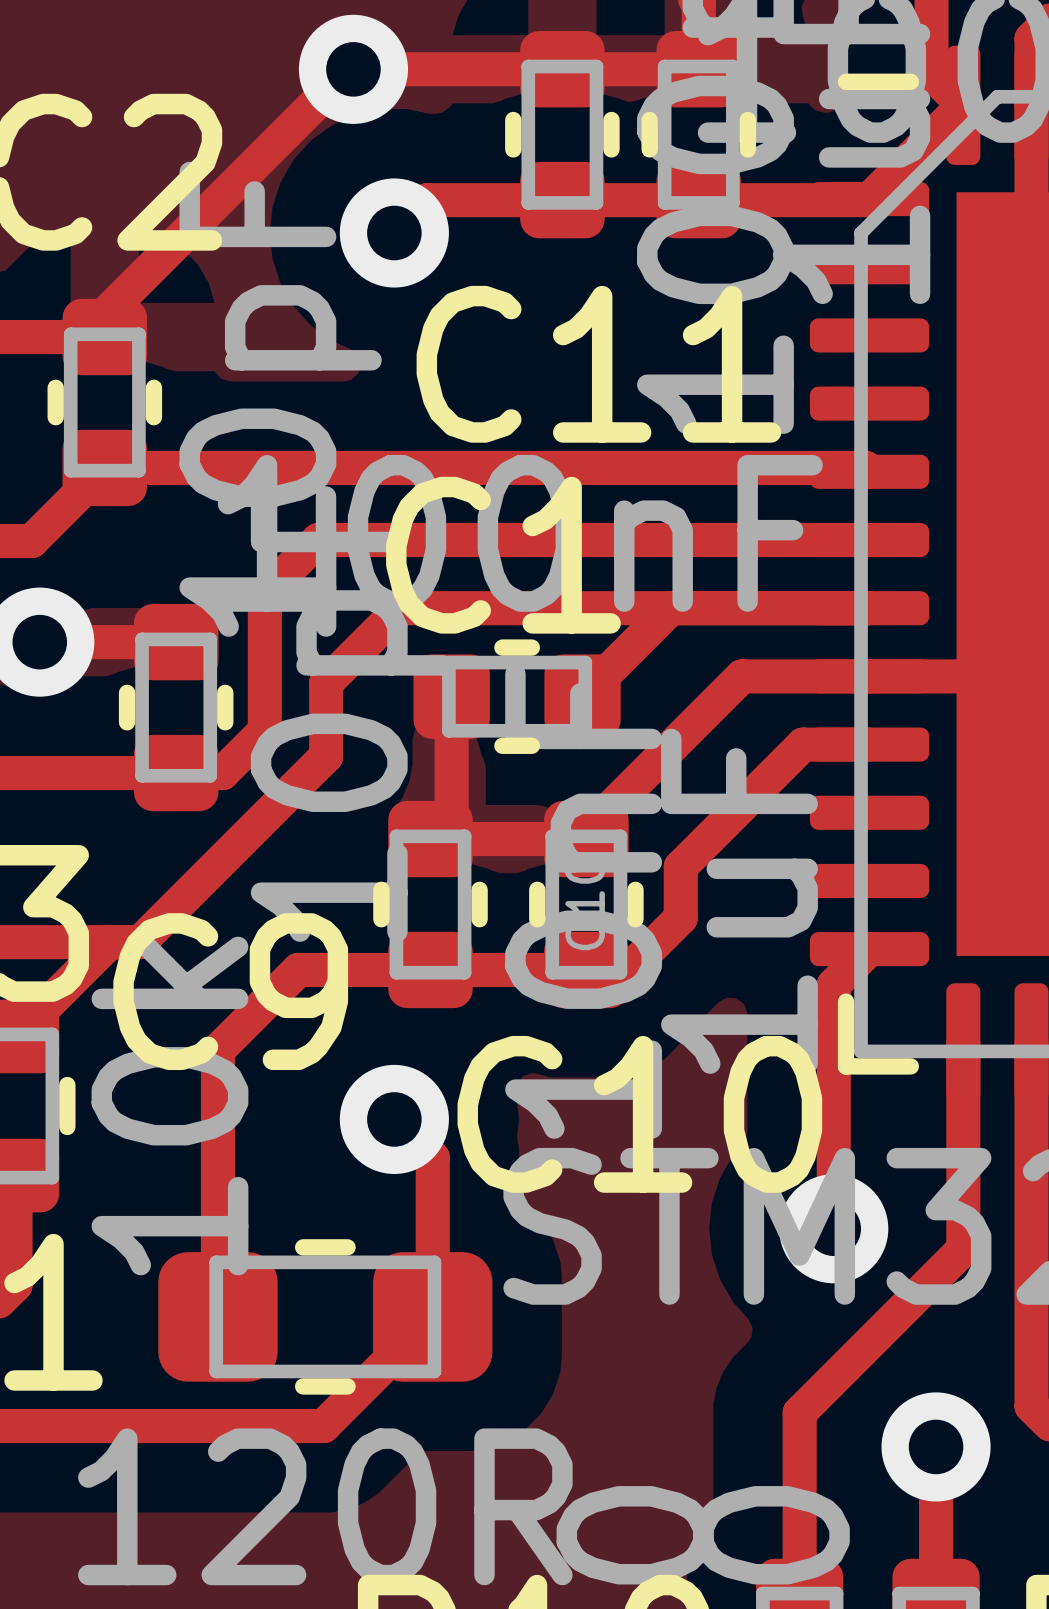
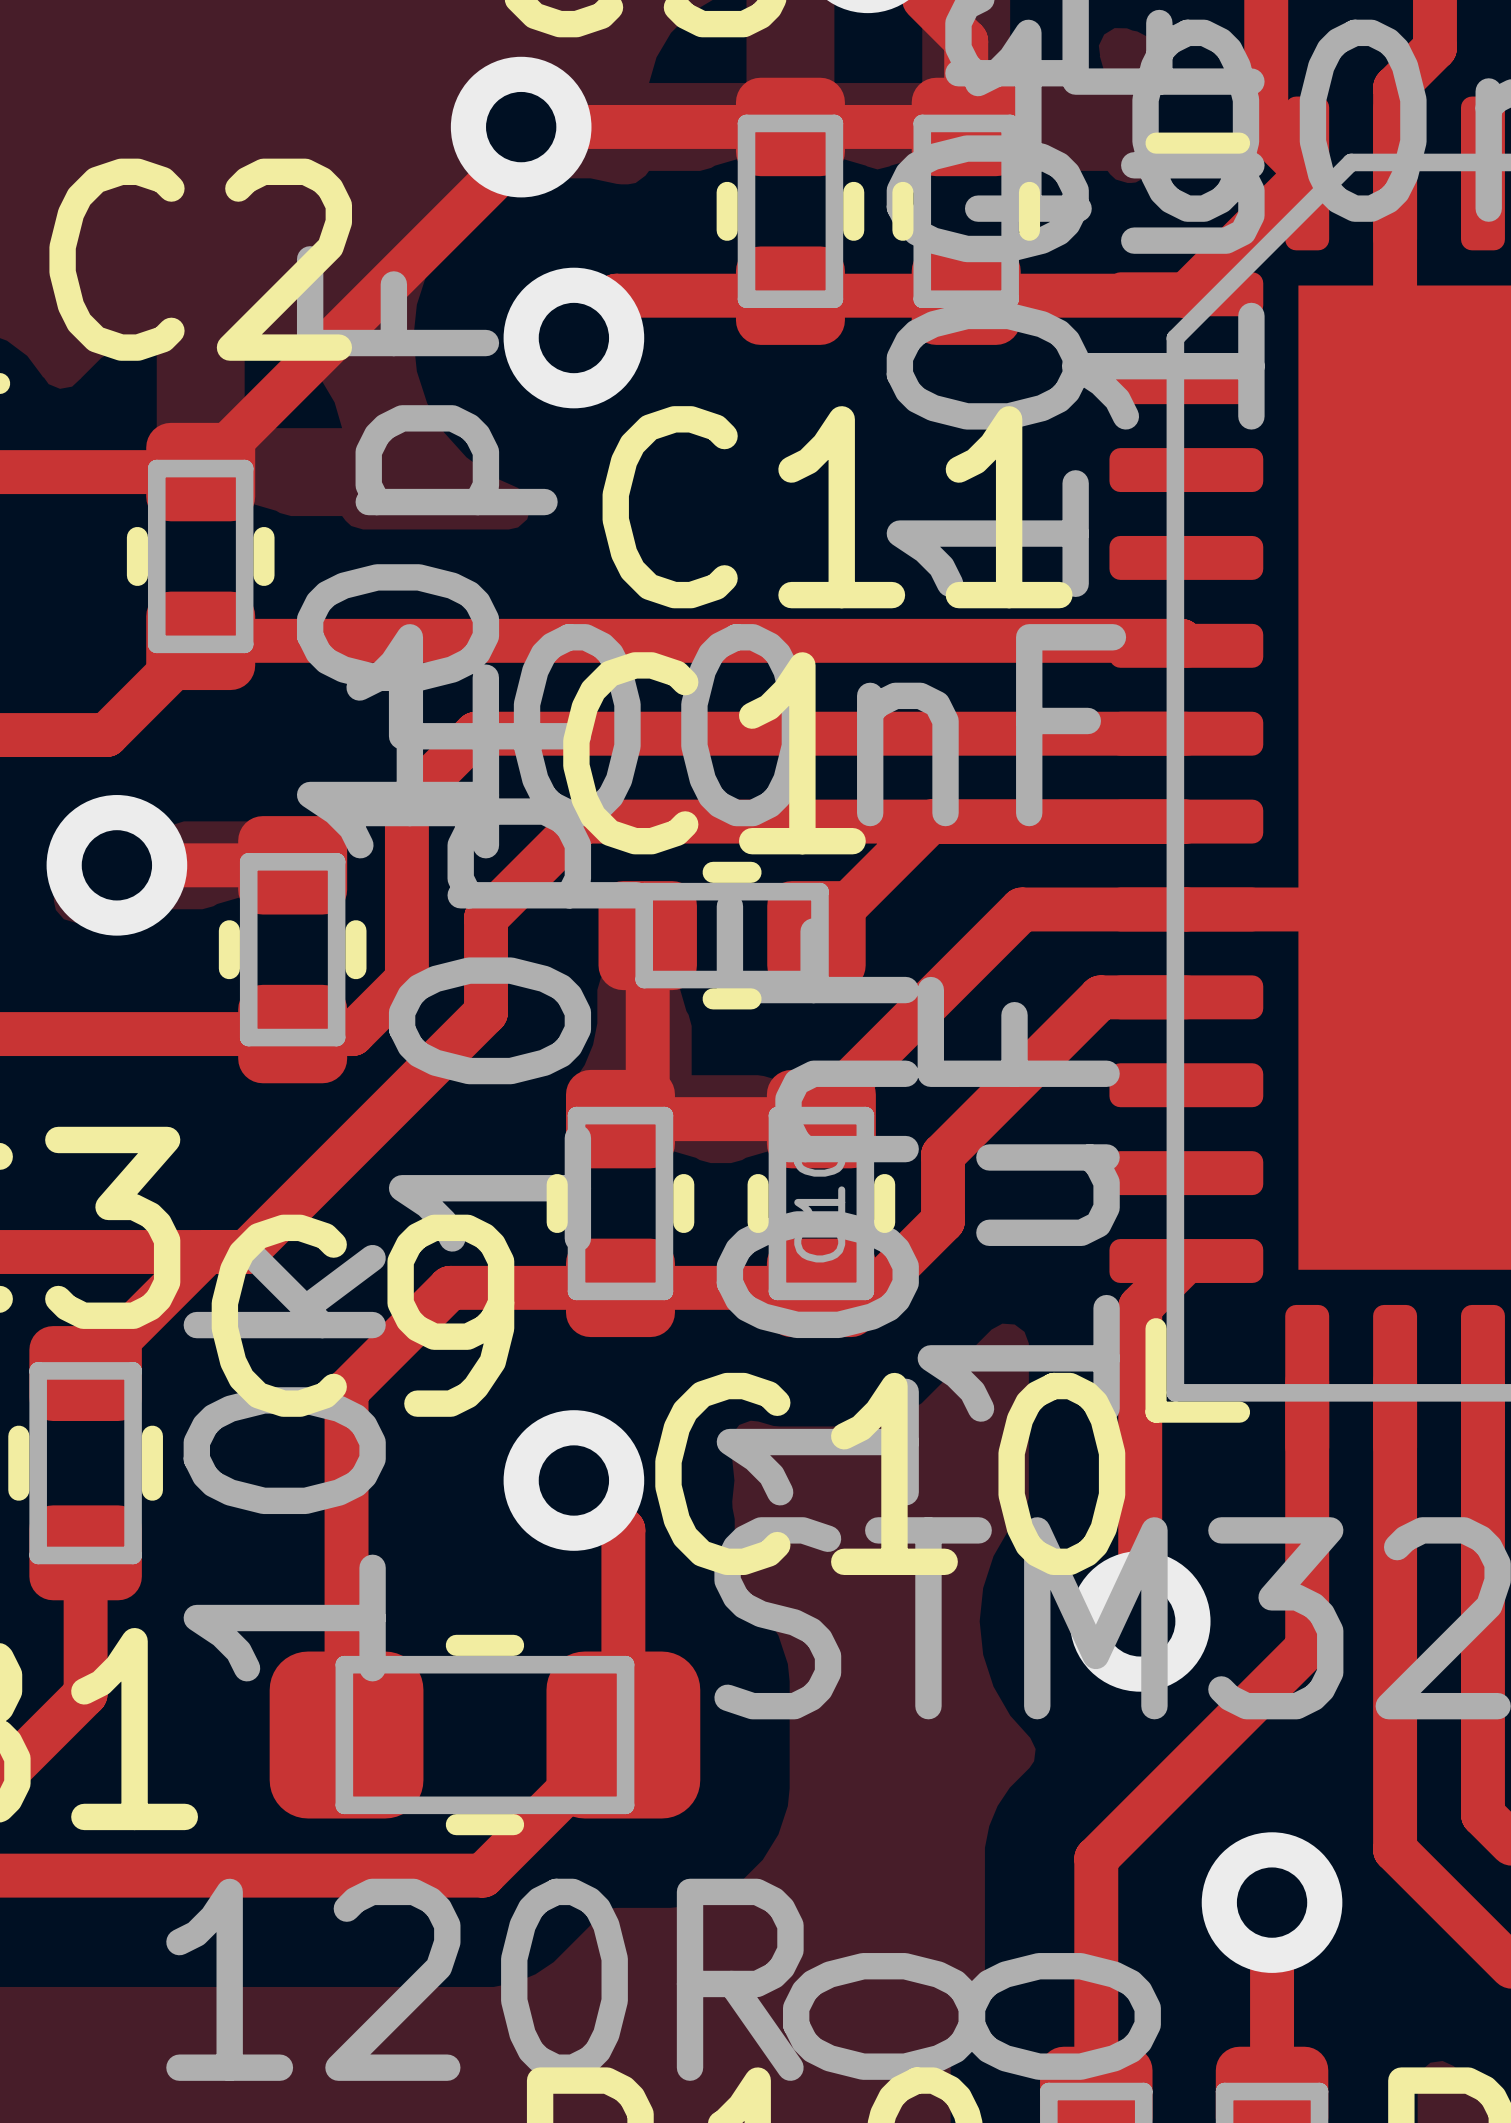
track: (353, 69) (349, 69) (104, 314) (104, 337) -> (521, 127) (521, 151) (200, 472)

